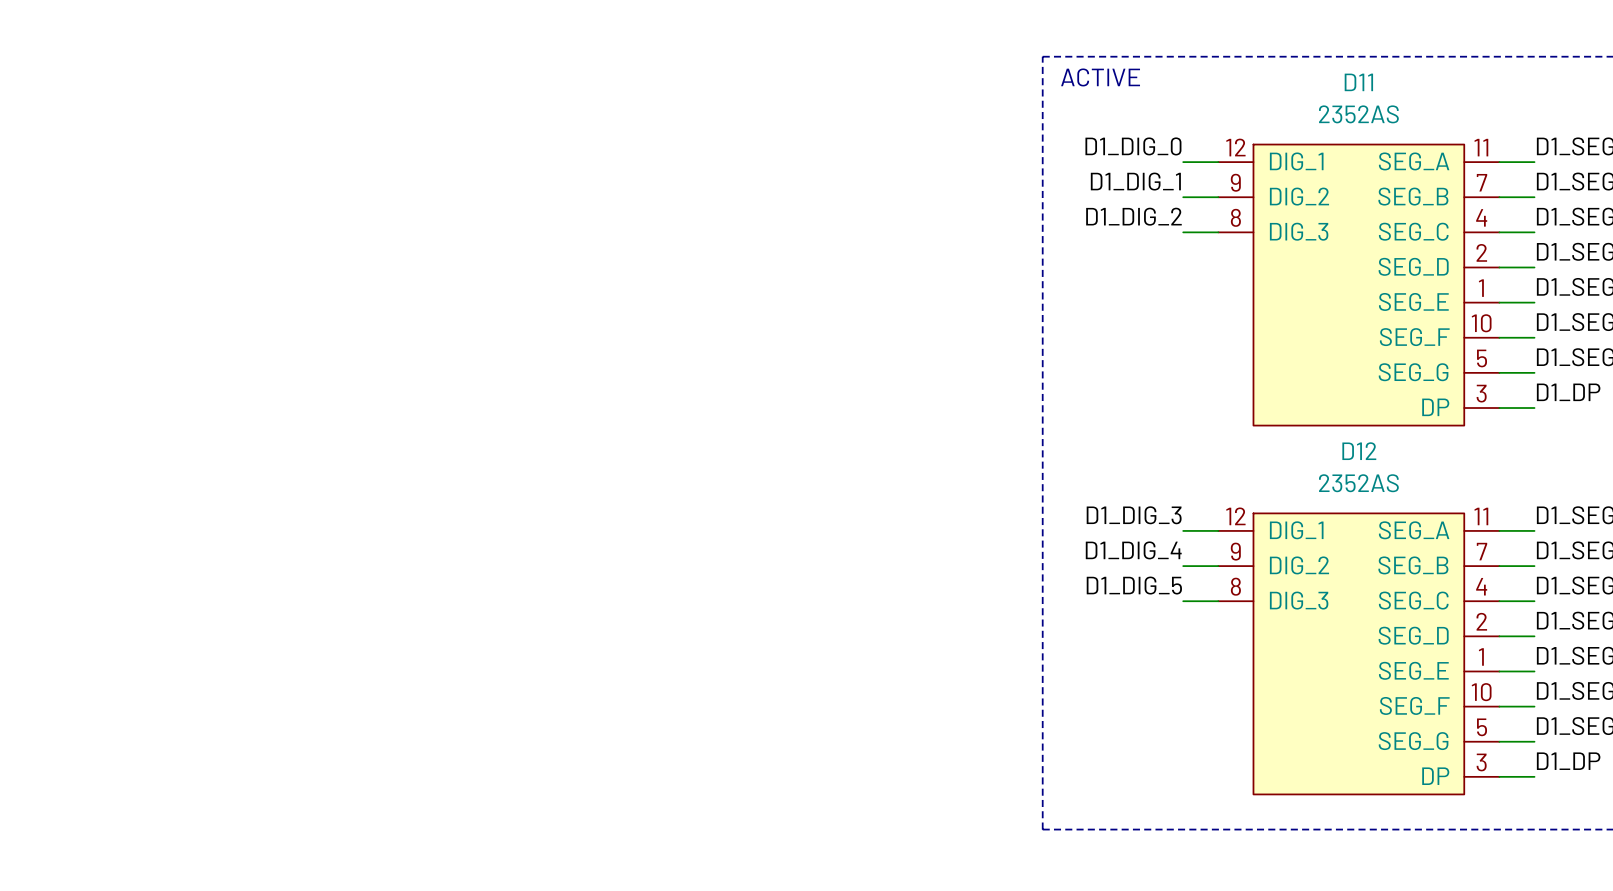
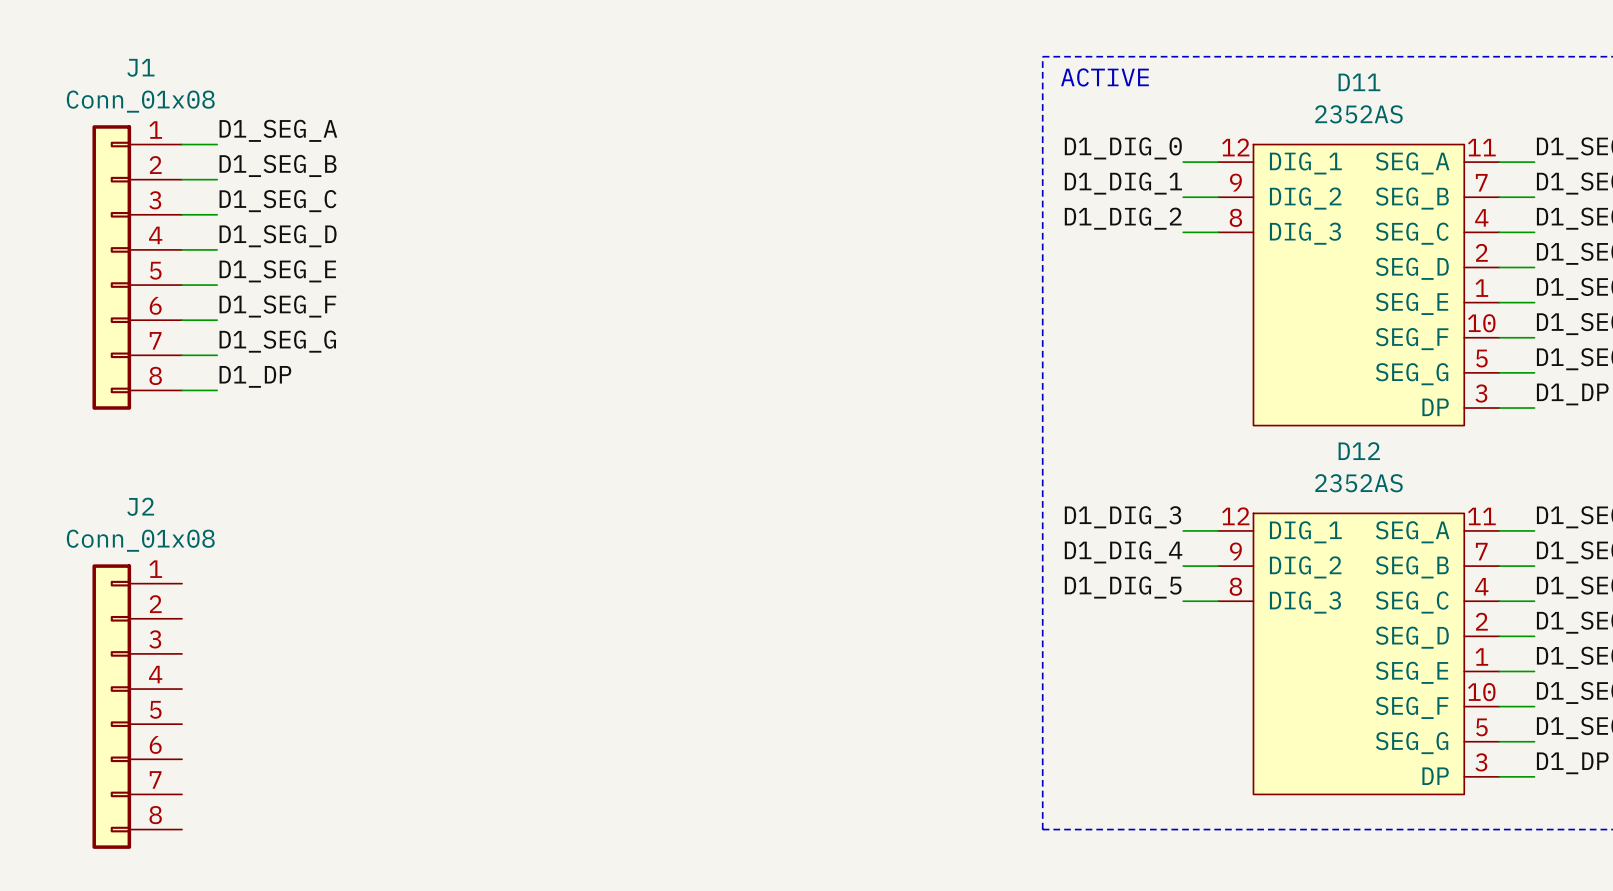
label: none -> D1_SEG_A (278, 130)
wire: none -> (182, 144) (217, 144)
label: none -> D1_SEG_B (278, 165)
wire: none -> (182, 179) (217, 179)
label: none -> D1_SEG_C (277, 201)
wire: none -> (182, 214) (217, 214)
label: none -> D1_SEG_D (278, 236)
wire: none -> (182, 249) (217, 249)
J1: none -> Conn_01x08 (137, 267)
label: none -> D1_SEG_E (277, 271)
wire: none -> (182, 285) (217, 285)
label: none -> D1_SEG_F (277, 306)
wire: none -> (182, 320) (217, 320)
label: none -> D1_SEG_G (277, 341)
wire: none -> (182, 355) (217, 355)
label: none -> D1_DP (255, 376)
wire: none -> (182, 390) (217, 390)
J2: none -> Conn_01x08 (137, 706)

